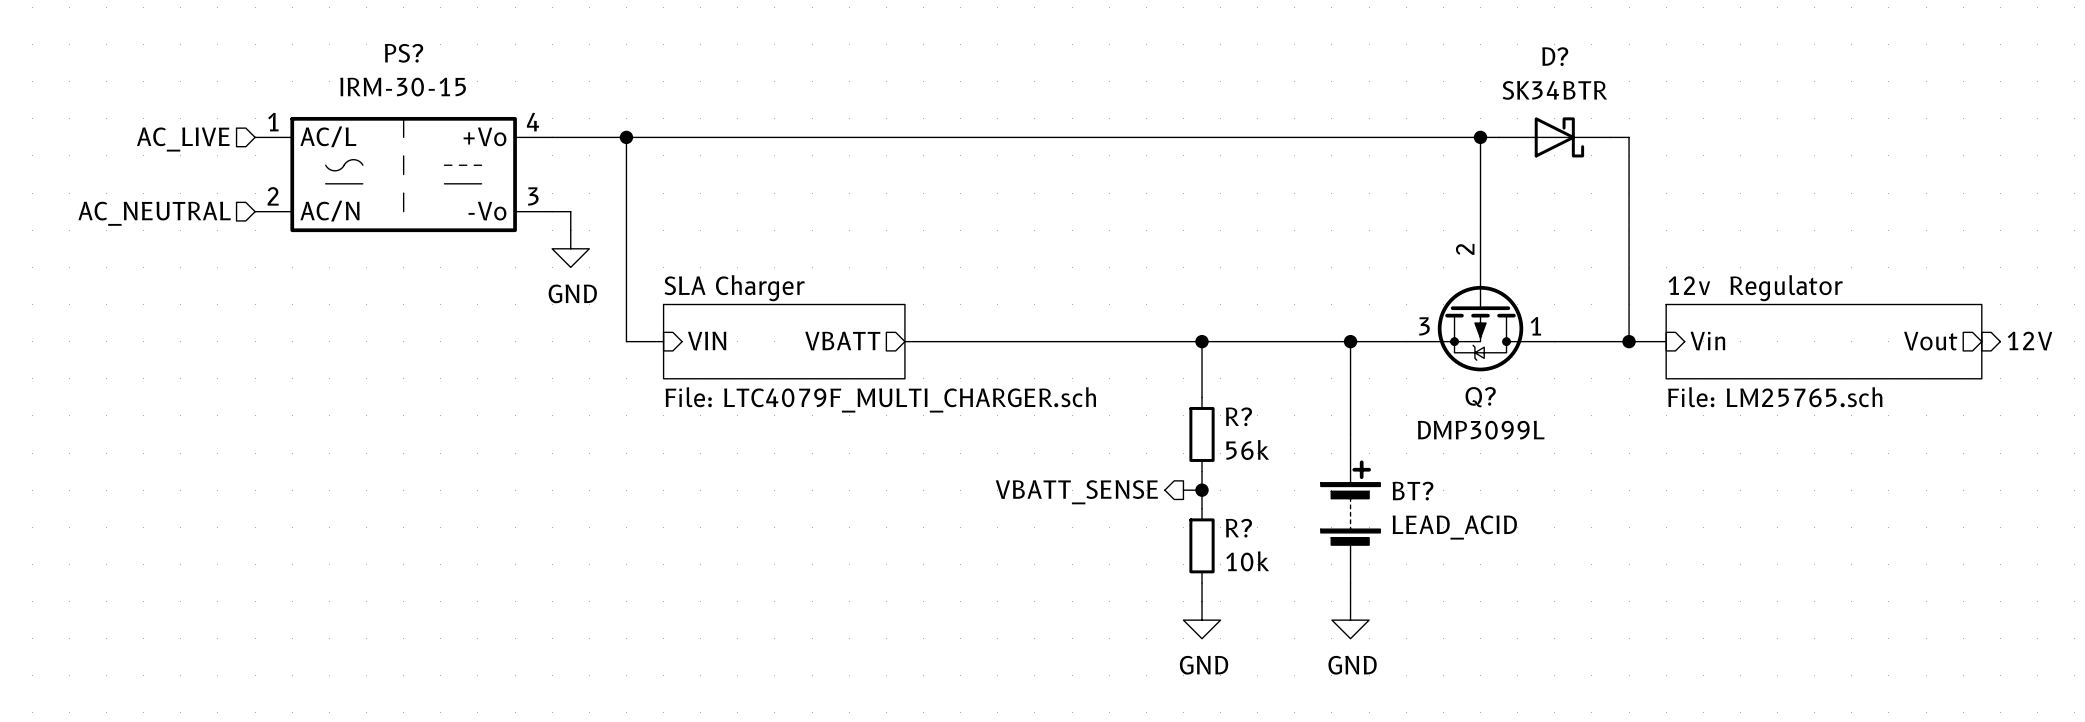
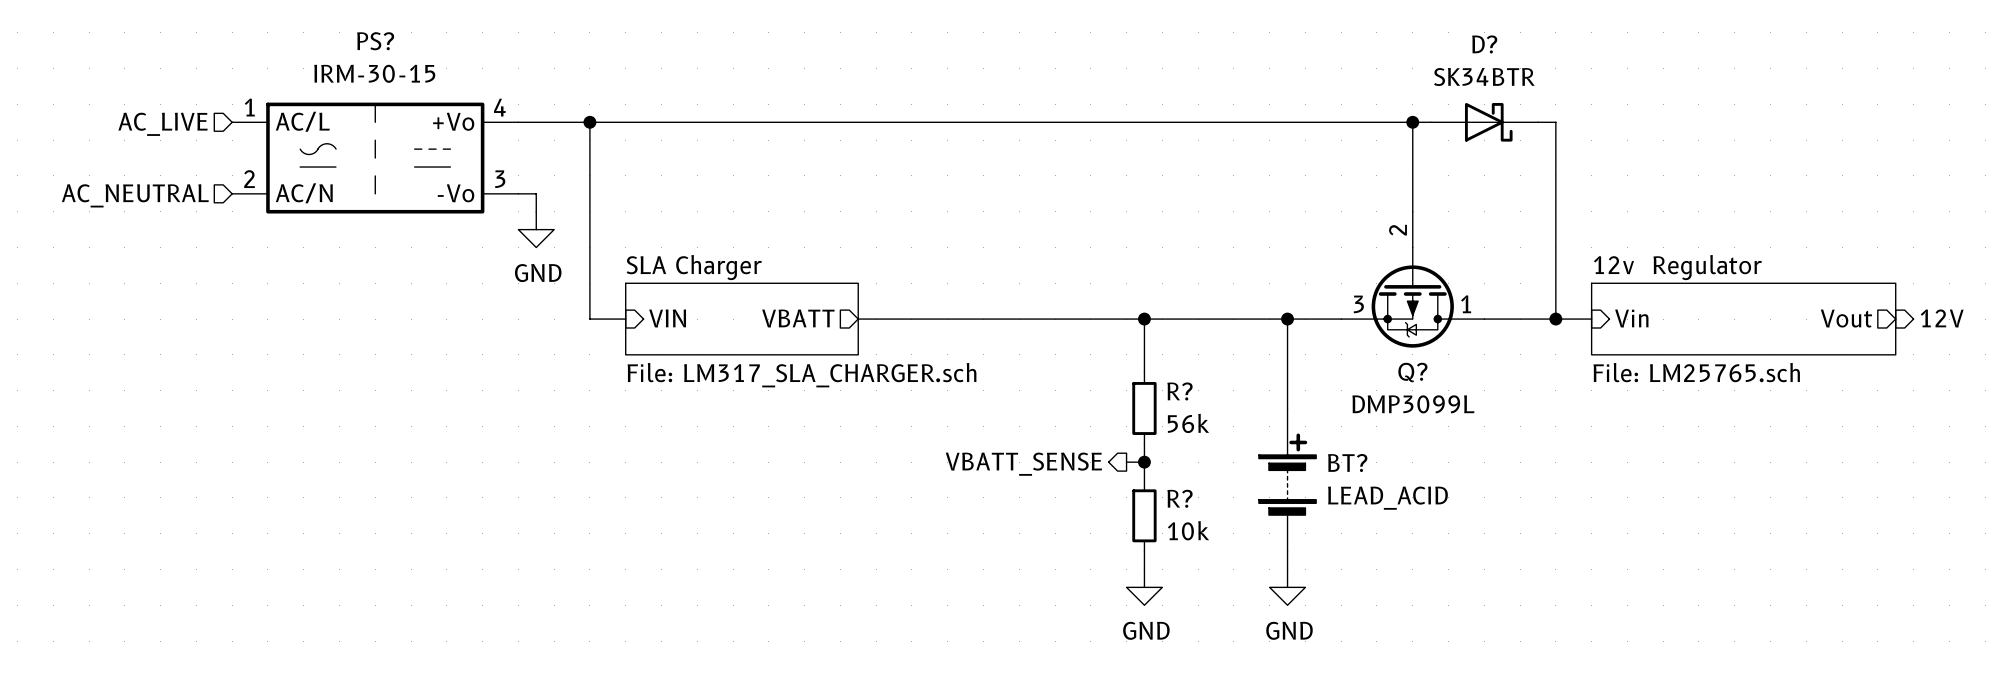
sheet SLA Charger value: File: LTC4079F_MULTI_CHARGER.sch (880, 399) -> File: LM317_SLA_CHARGER.sch (801, 375)

